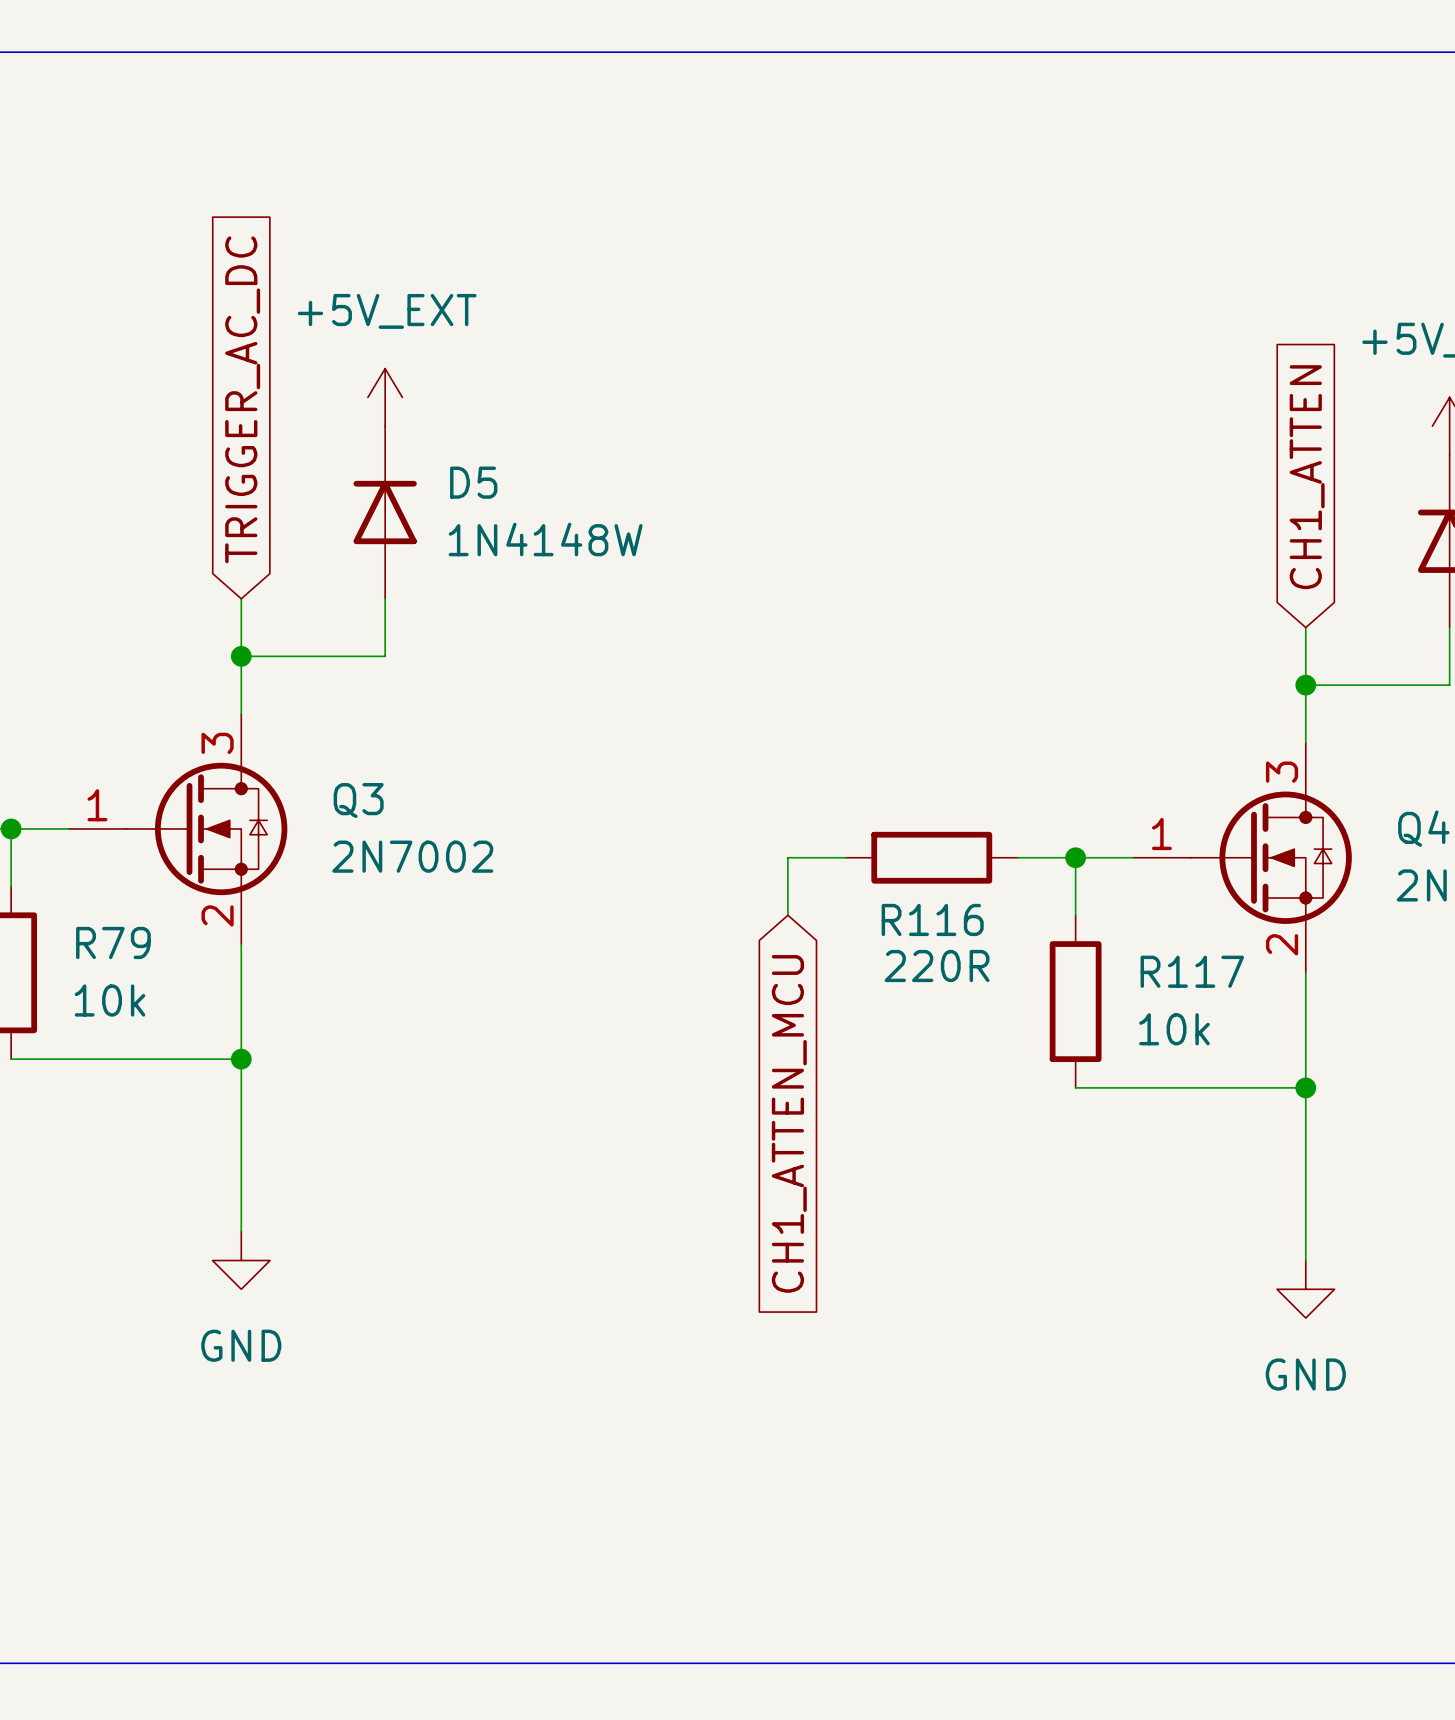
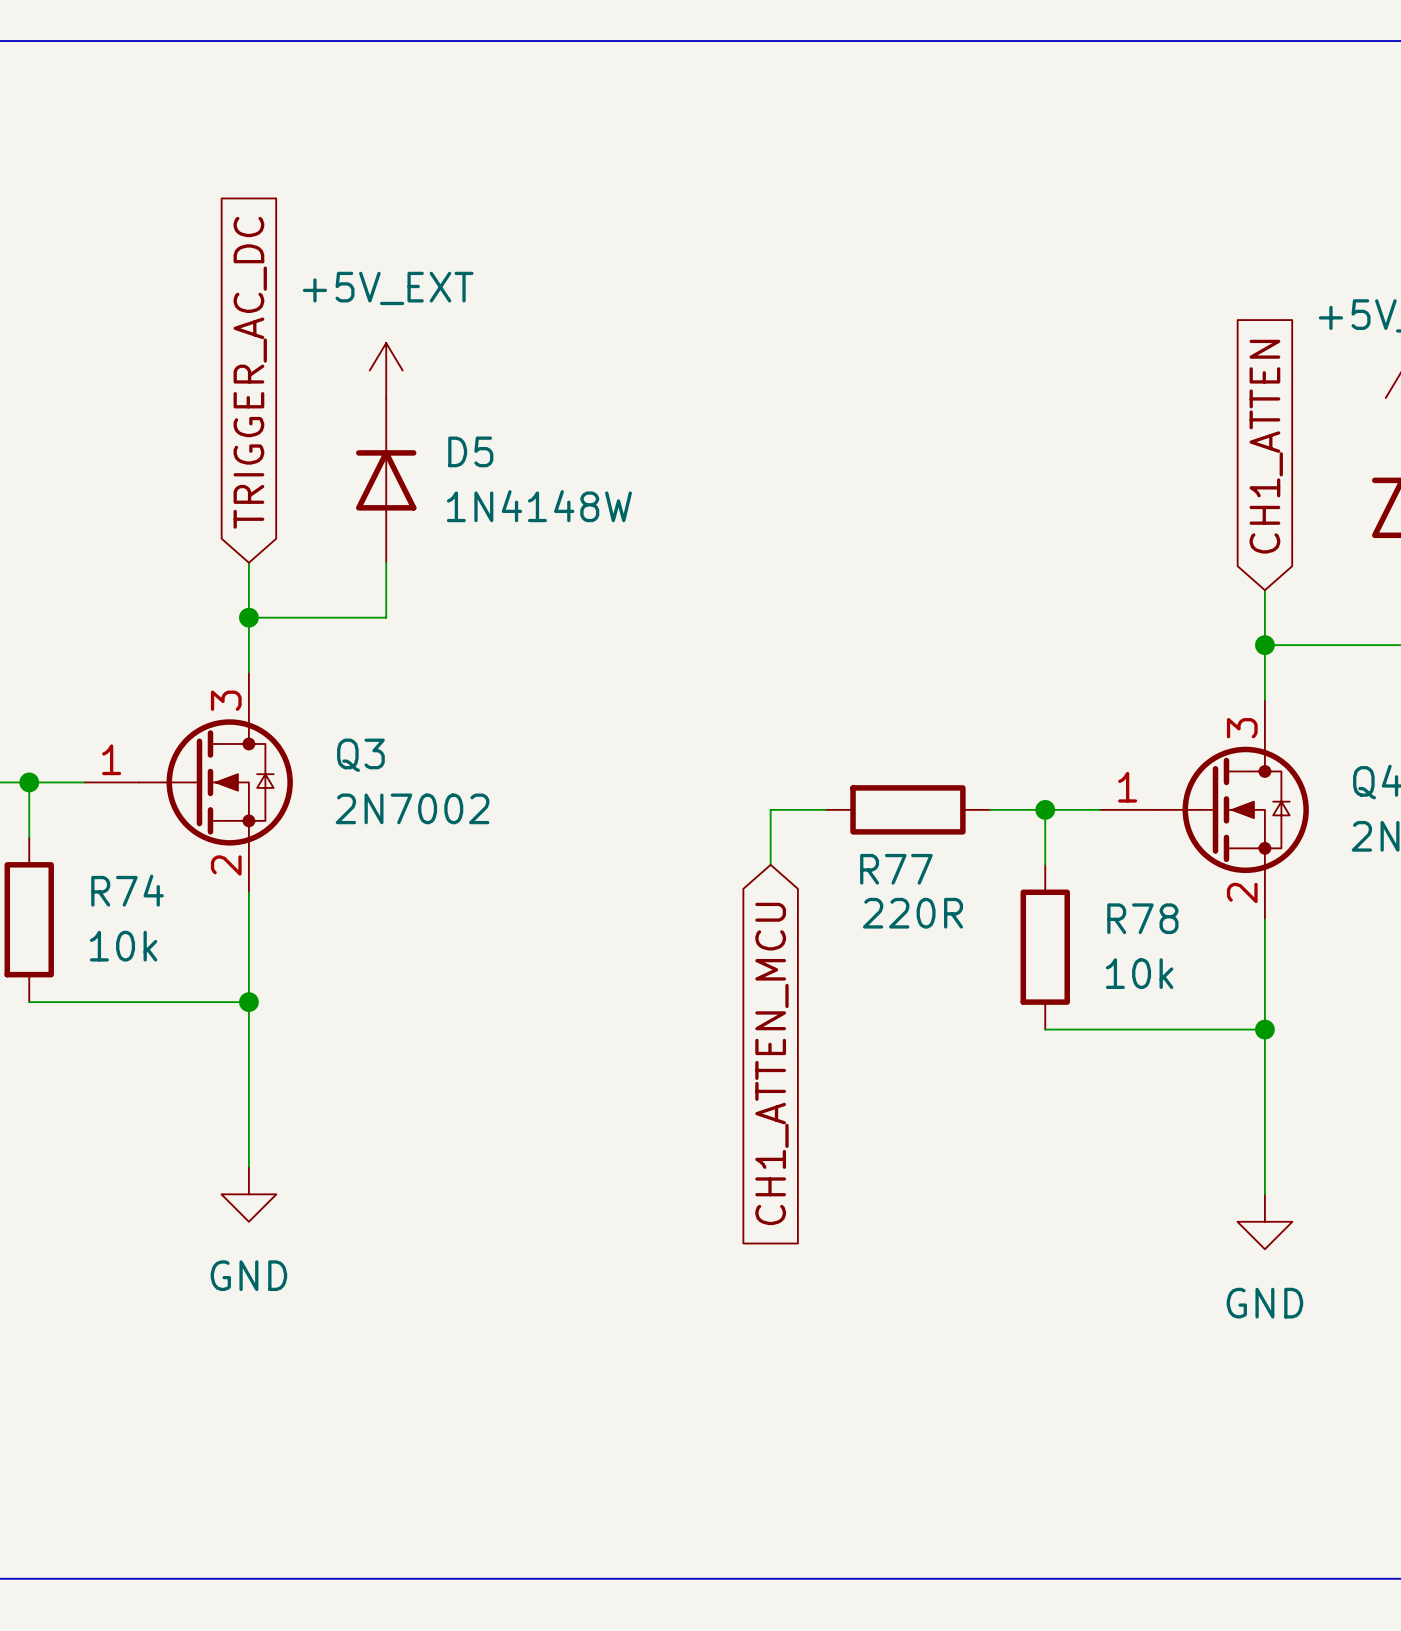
R116 name: R116 (932, 919) -> R77 (896, 869)
R79 name: R79 (113, 942) -> R74 (127, 890)
R117 name: R117 (1192, 971) -> R78 (1142, 918)

